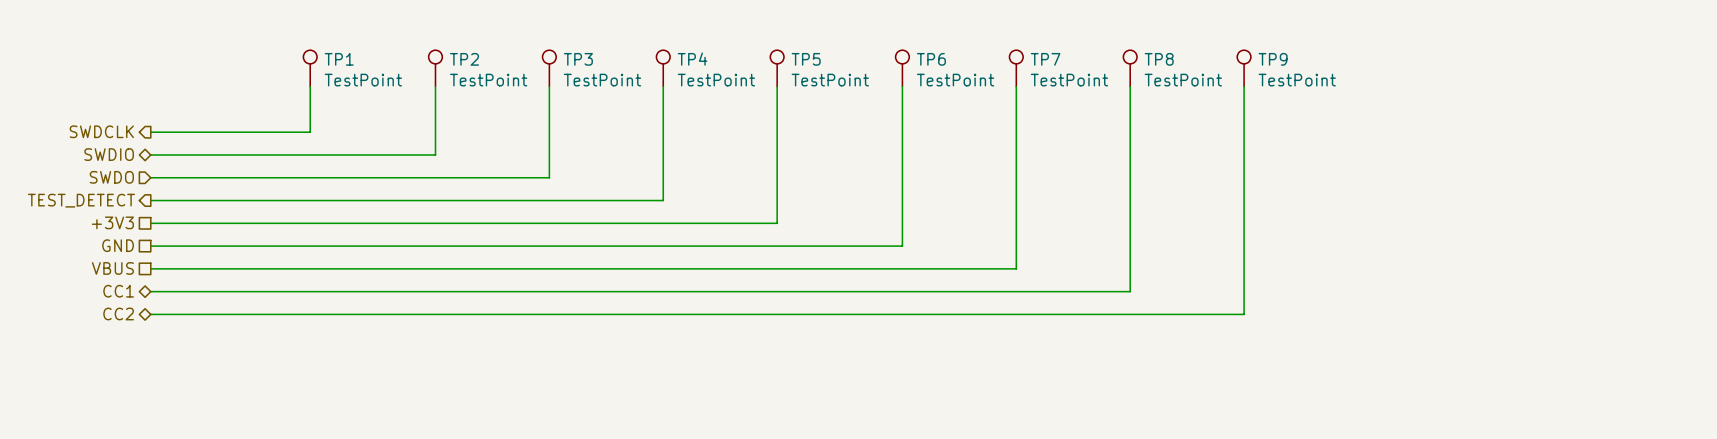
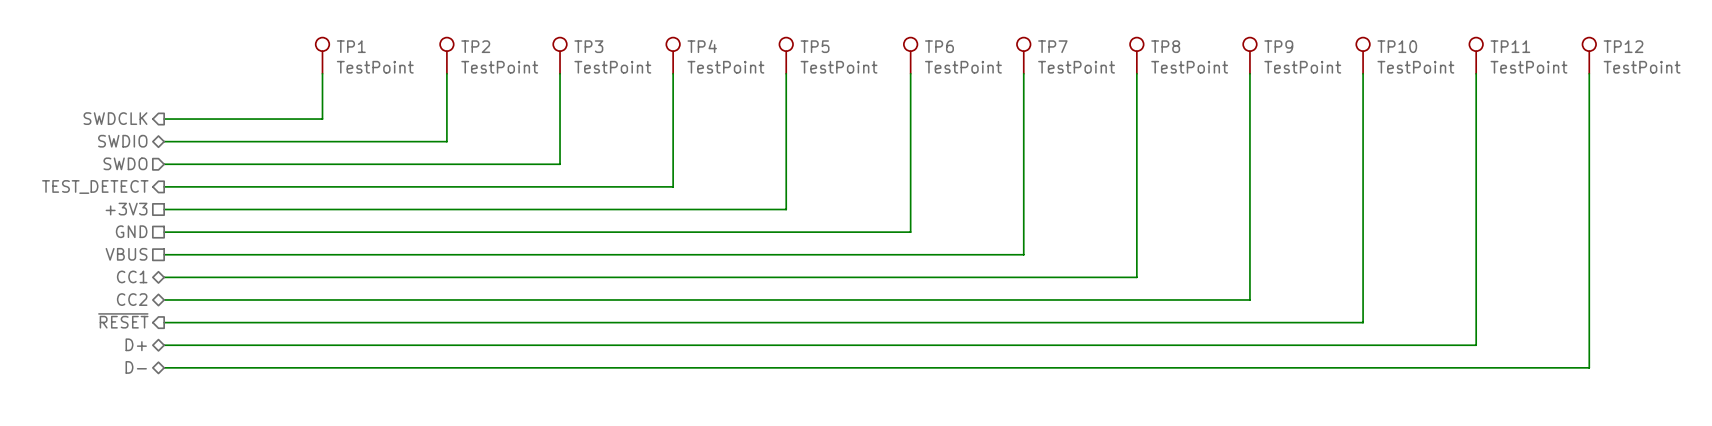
TP10: none -> TestPoint (1363, 55)
TP11: none -> TestPoint (1476, 55)
TP12: none -> TestPoint (1589, 55)
wire: none -> (1363, 73) (1363, 322) (164, 322)
wire: none -> (1476, 73) (1476, 345) (164, 345)
wire: none -> (1589, 73) (1589, 367) (164, 367)
hierarchical label: none -> ~{RESET} (123, 320)
hierarchical label: none -> D+ (136, 344)
hierarchical label: none -> D- (136, 367)

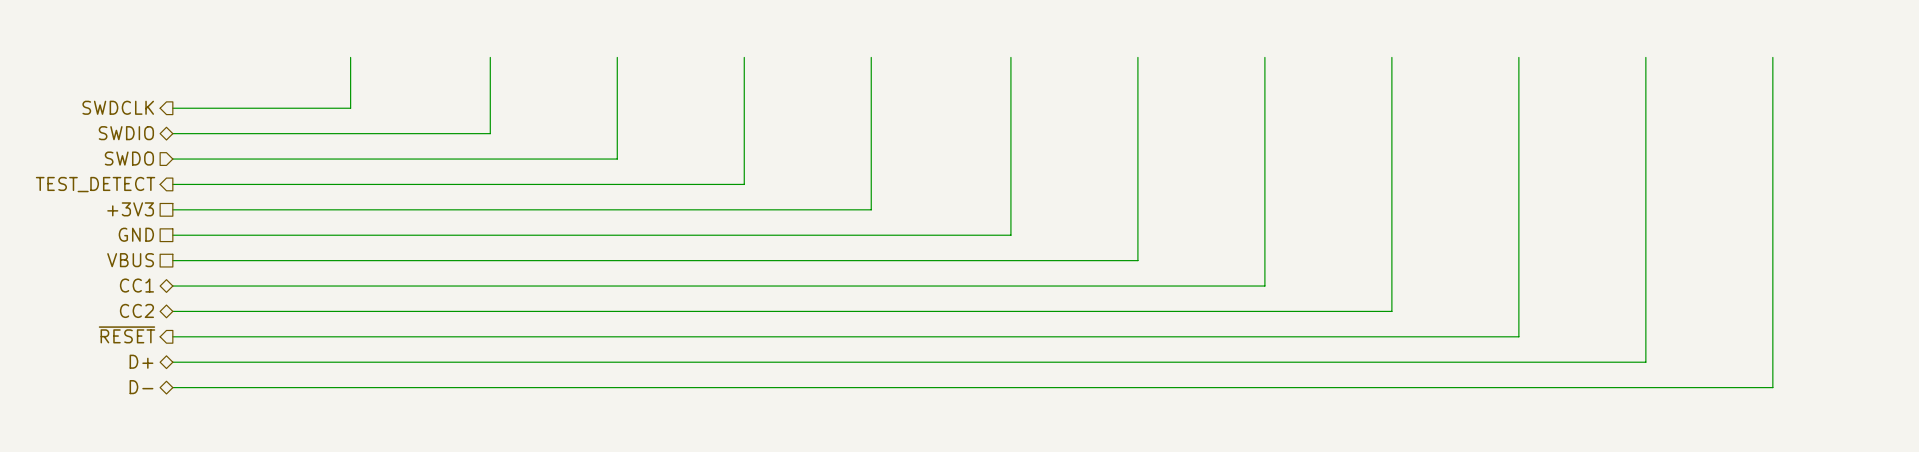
TP1: TestPoint (322, 55) -> none
TP2: TestPoint (446, 55) -> none
TP3: TestPoint (560, 55) -> none
TP4: TestPoint (673, 55) -> none
TP5: TestPoint (786, 55) -> none
TP6: TestPoint (910, 55) -> none
TP7: TestPoint (1023, 55) -> none
TP8: TestPoint (1136, 55) -> none
TP9: TestPoint (1249, 55) -> none
TP10: TestPoint (1363, 55) -> none
TP11: TestPoint (1476, 55) -> none
TP12: TestPoint (1589, 55) -> none

